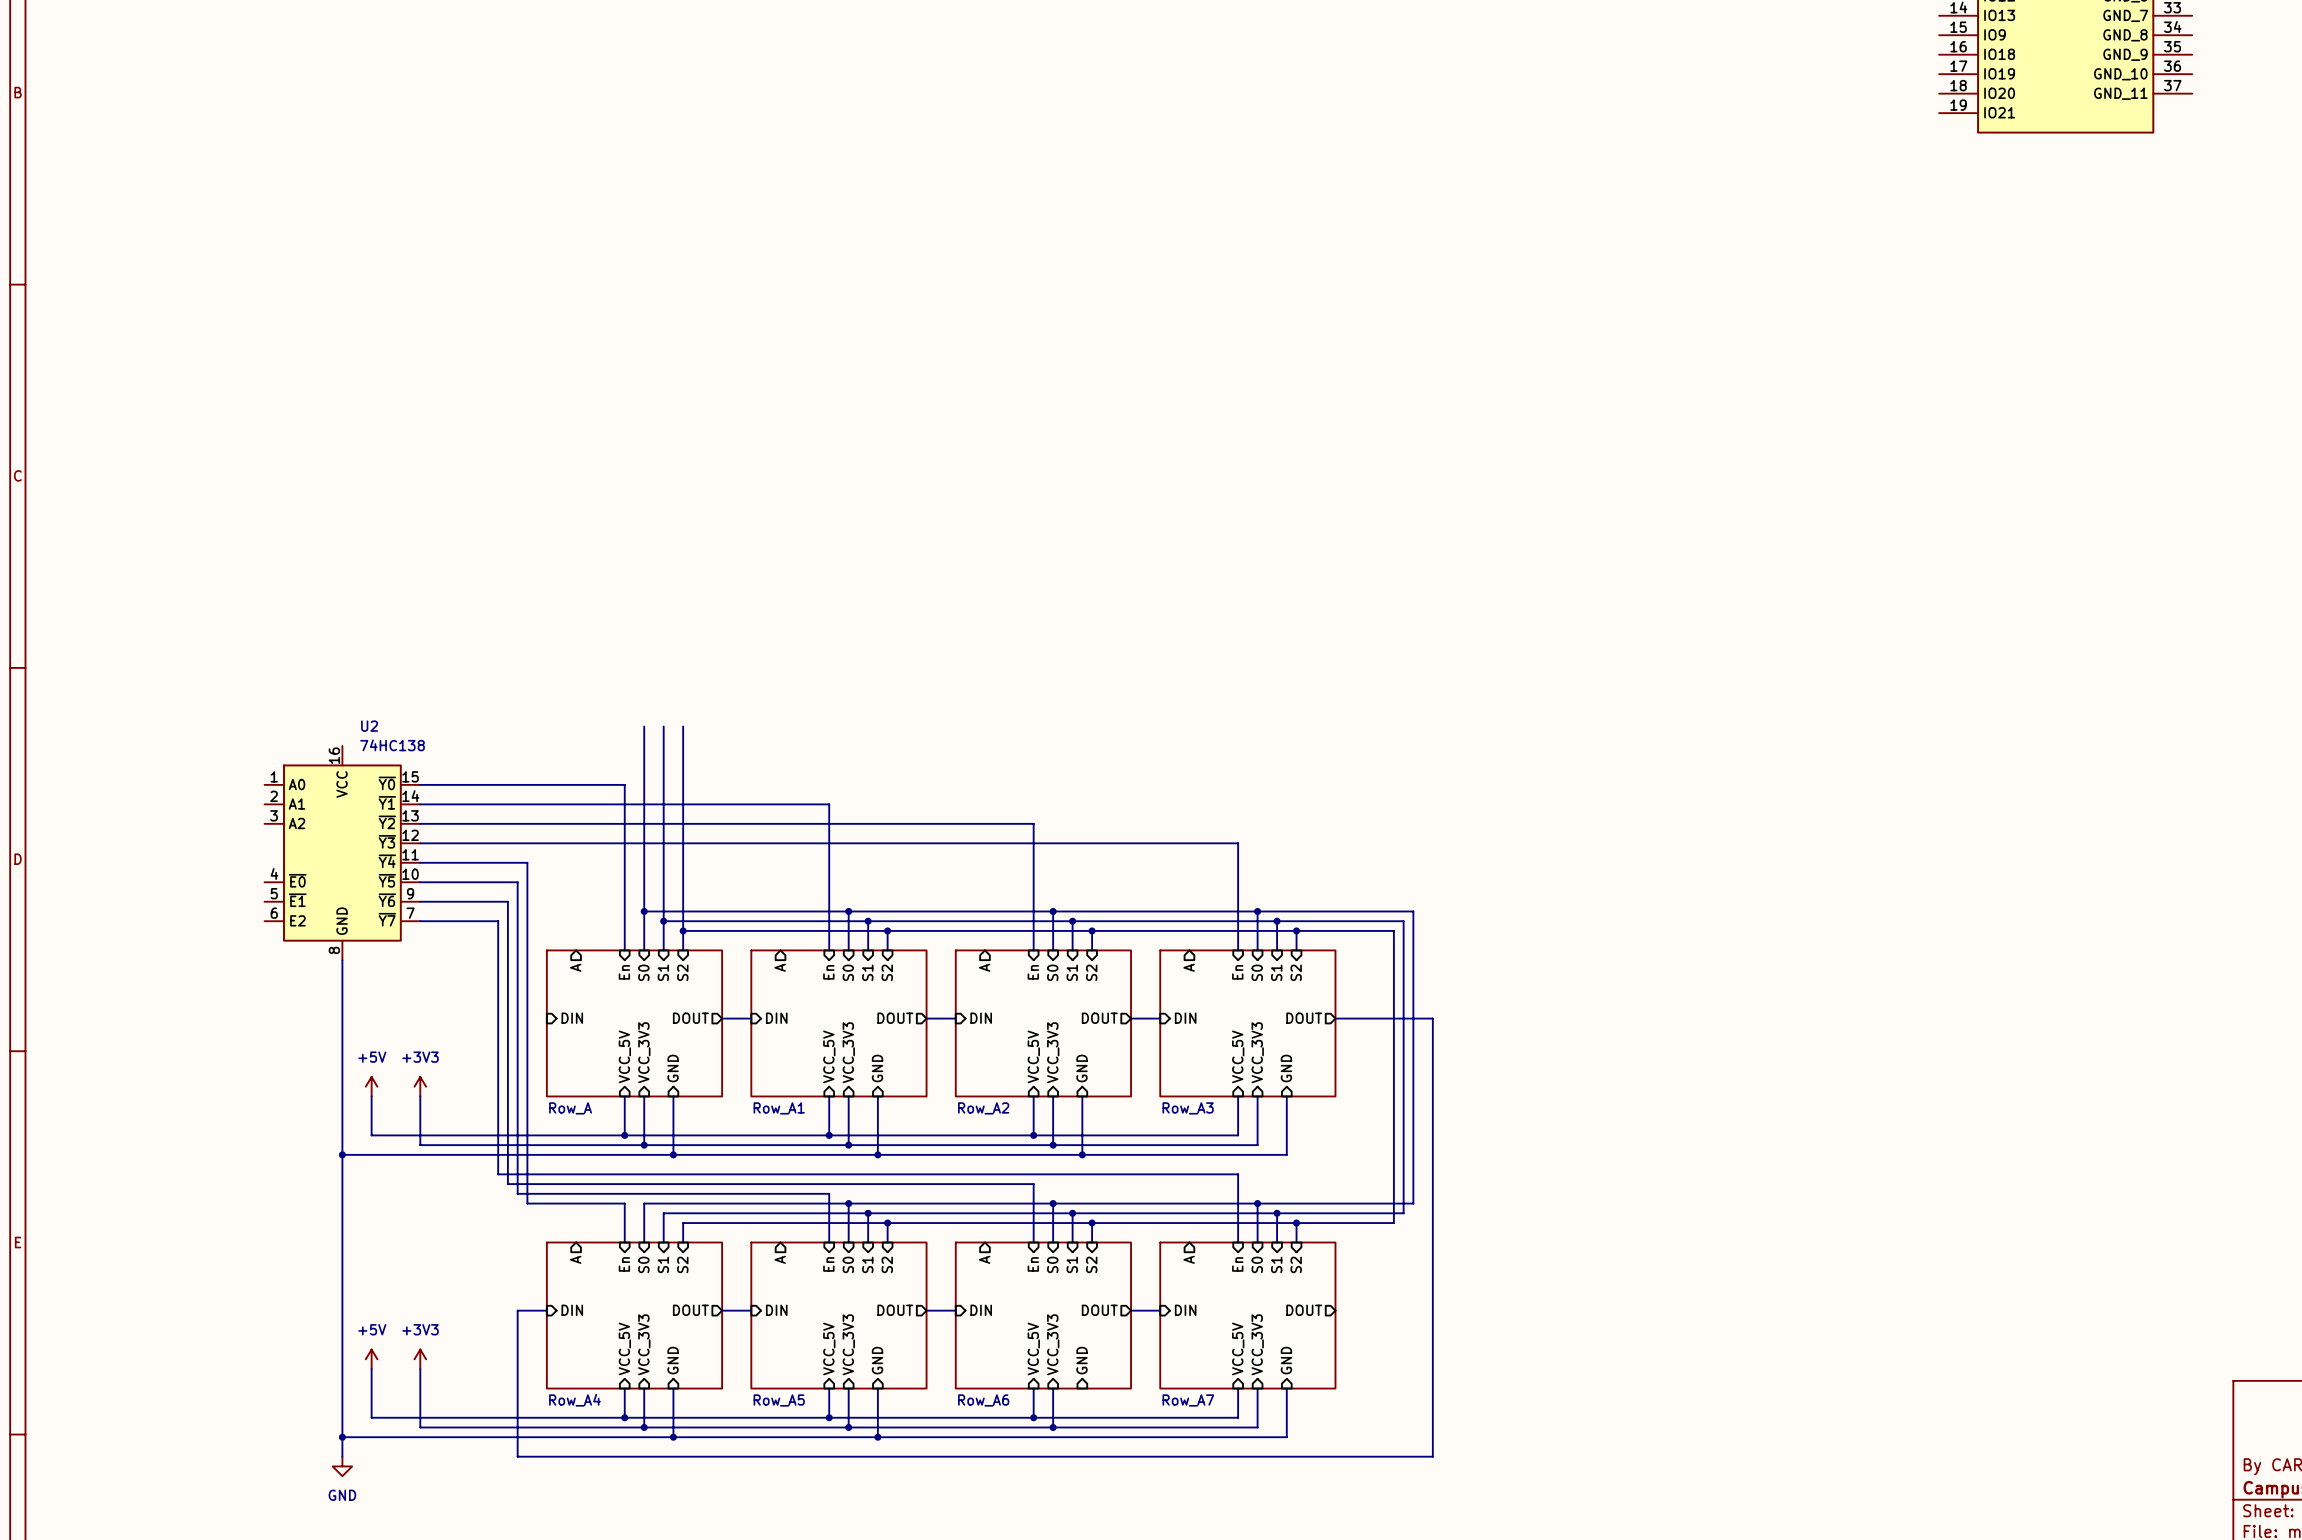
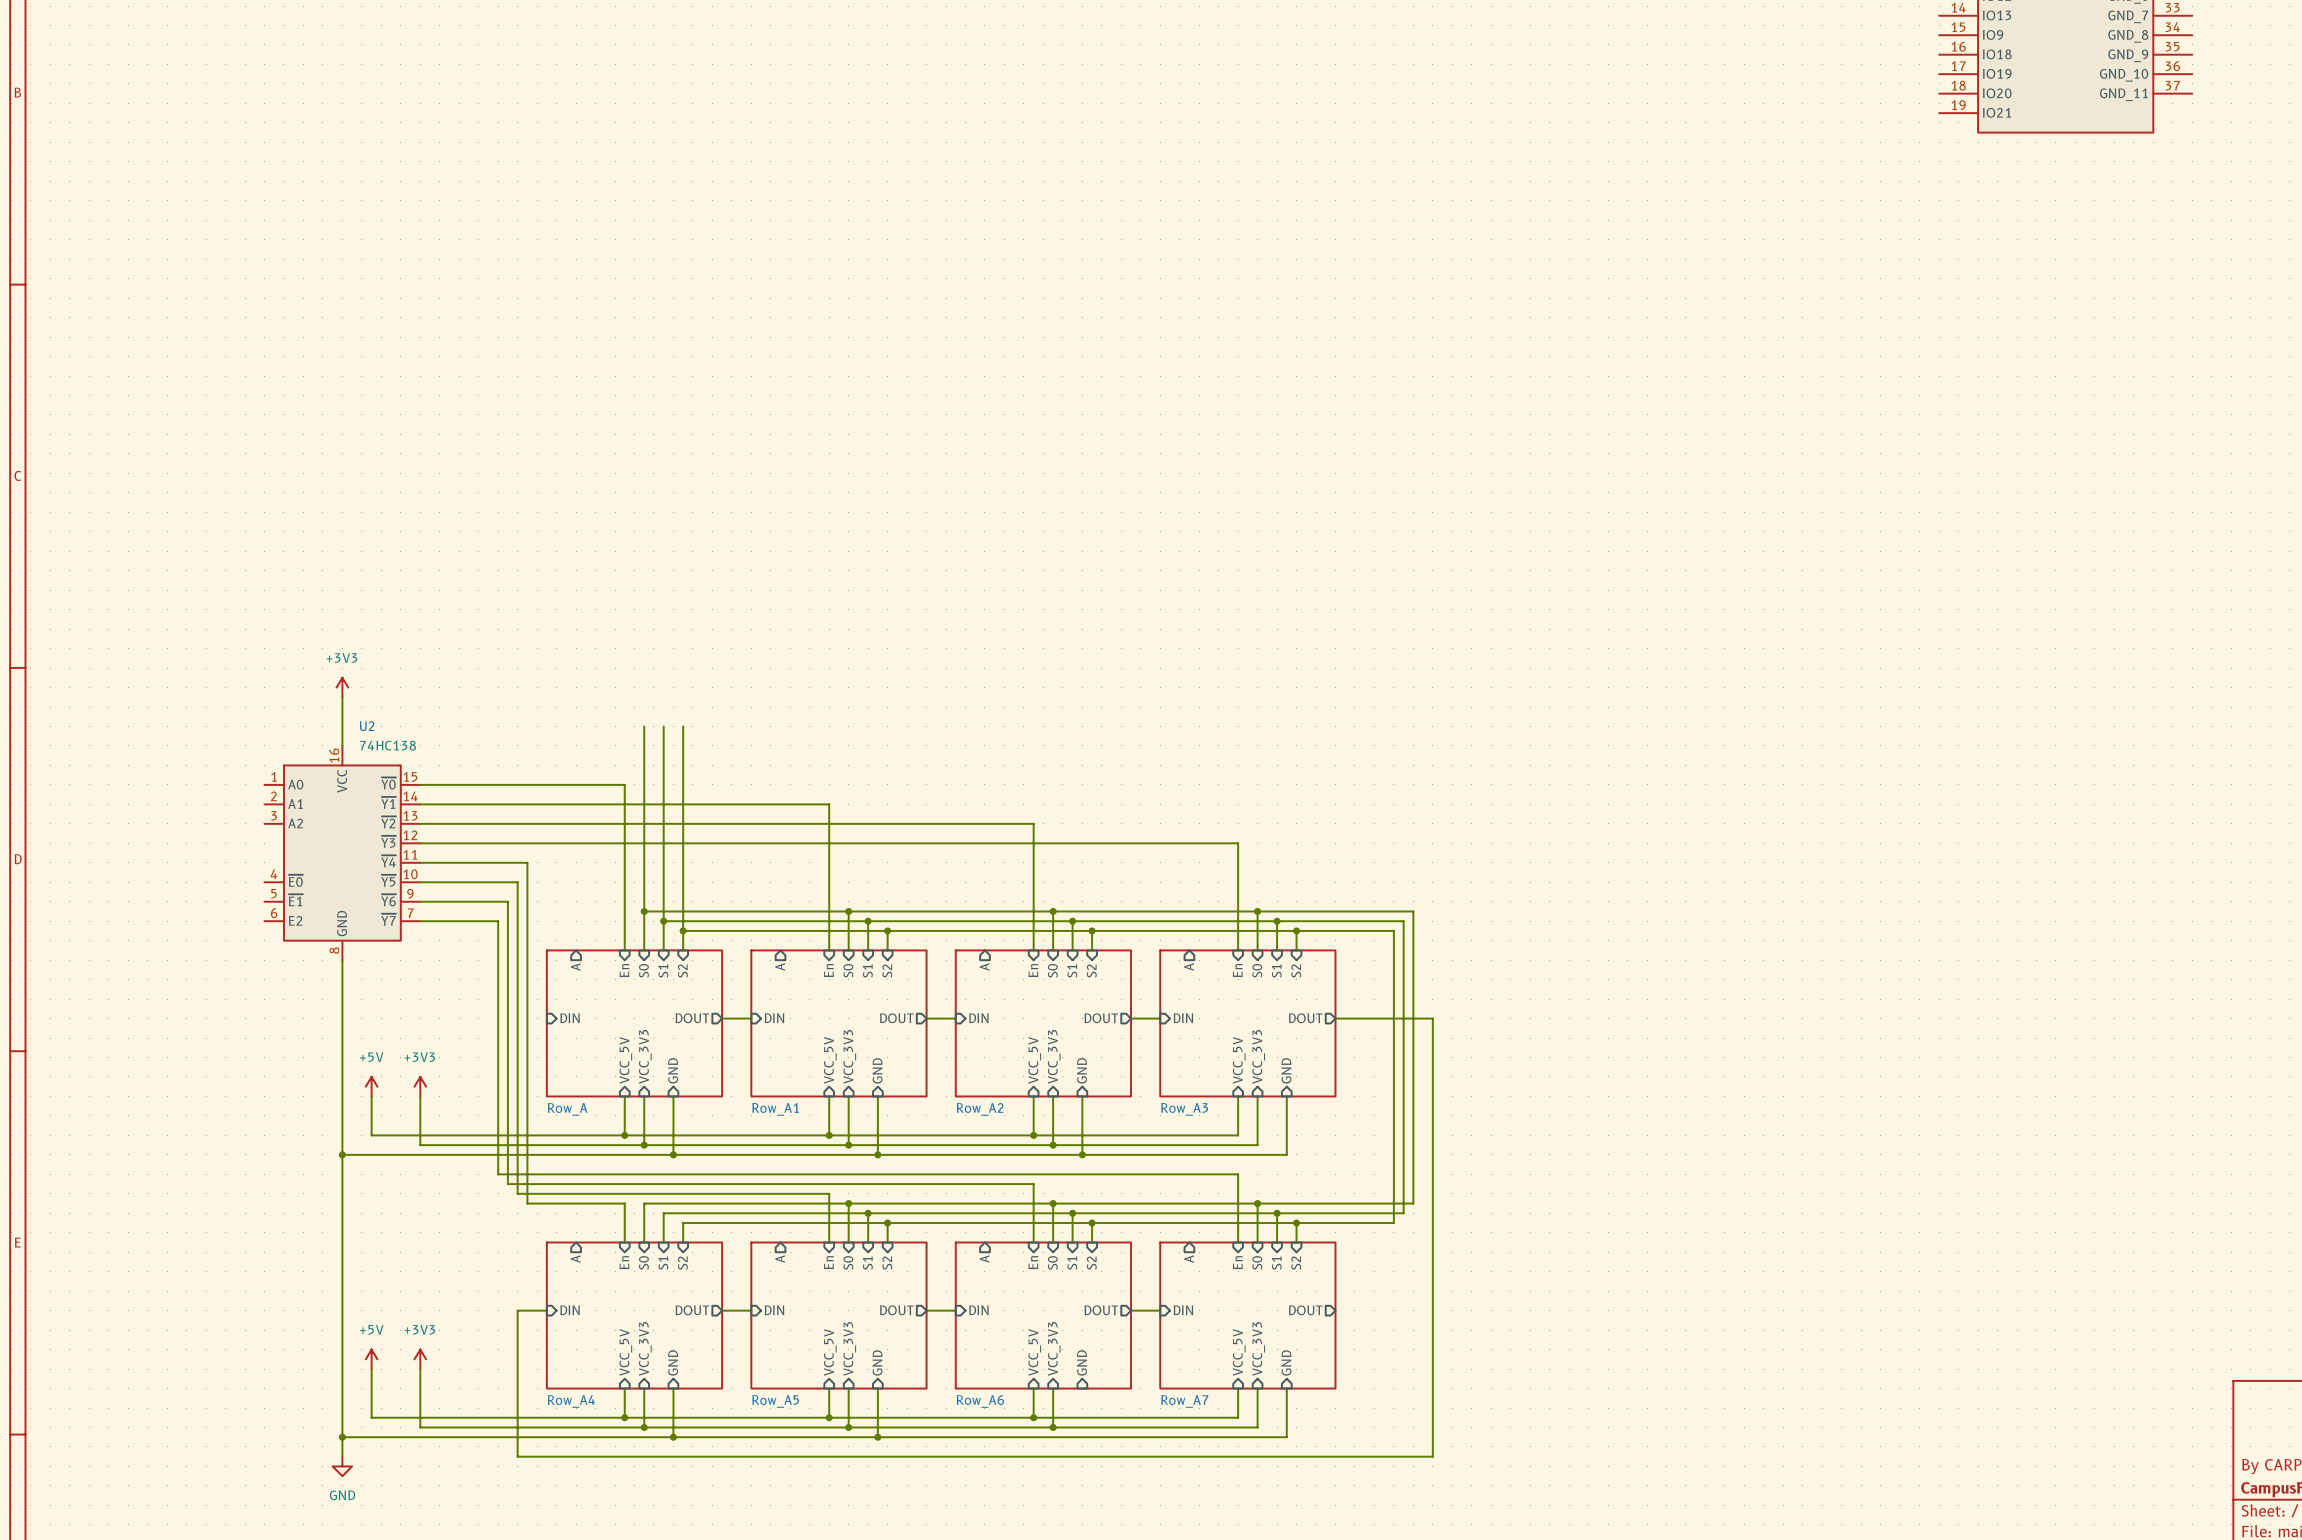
power symbol: none -> +3V3 (342, 687)
wire: none -> (342, 697) (342, 745)

